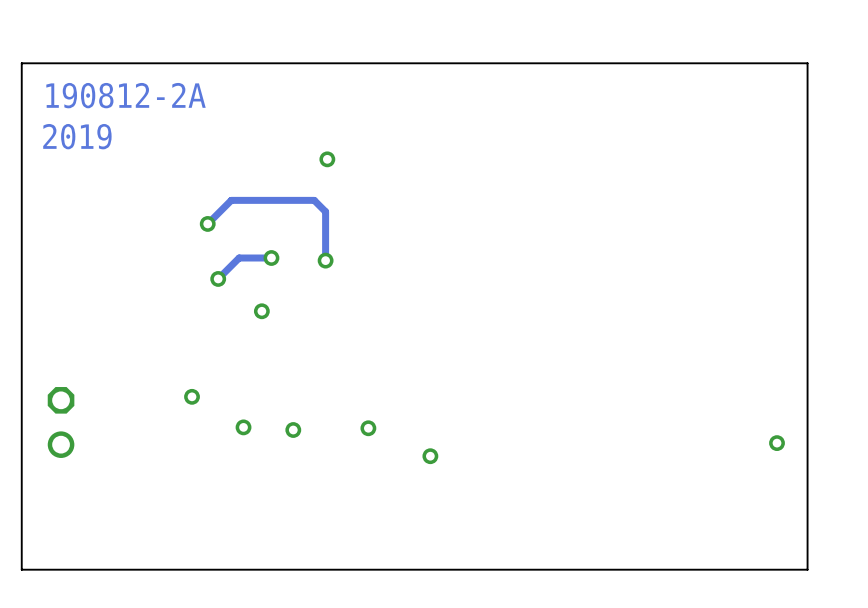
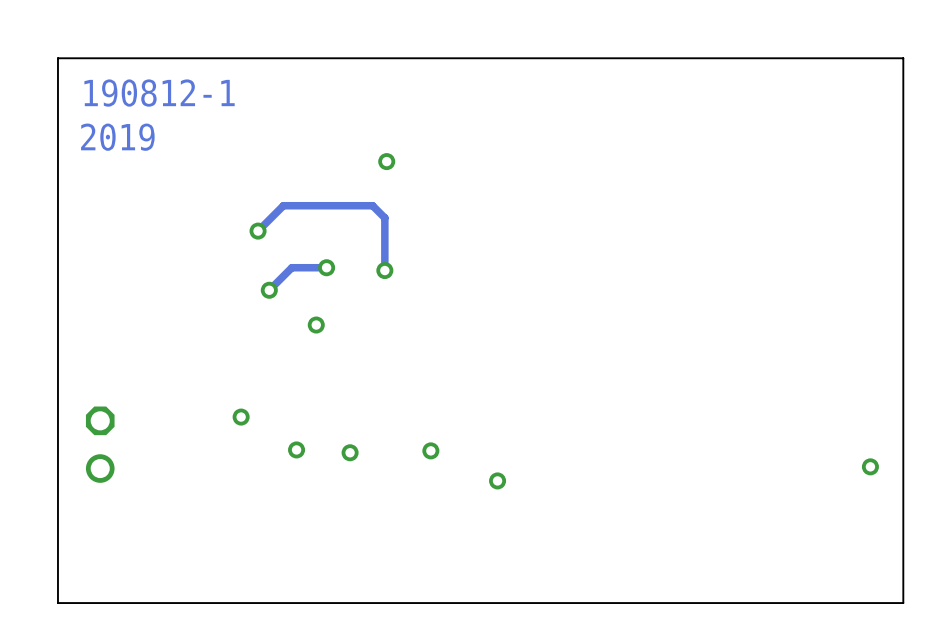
text: 190812-2A (126, 95) -> 190812-1 (159, 93)

